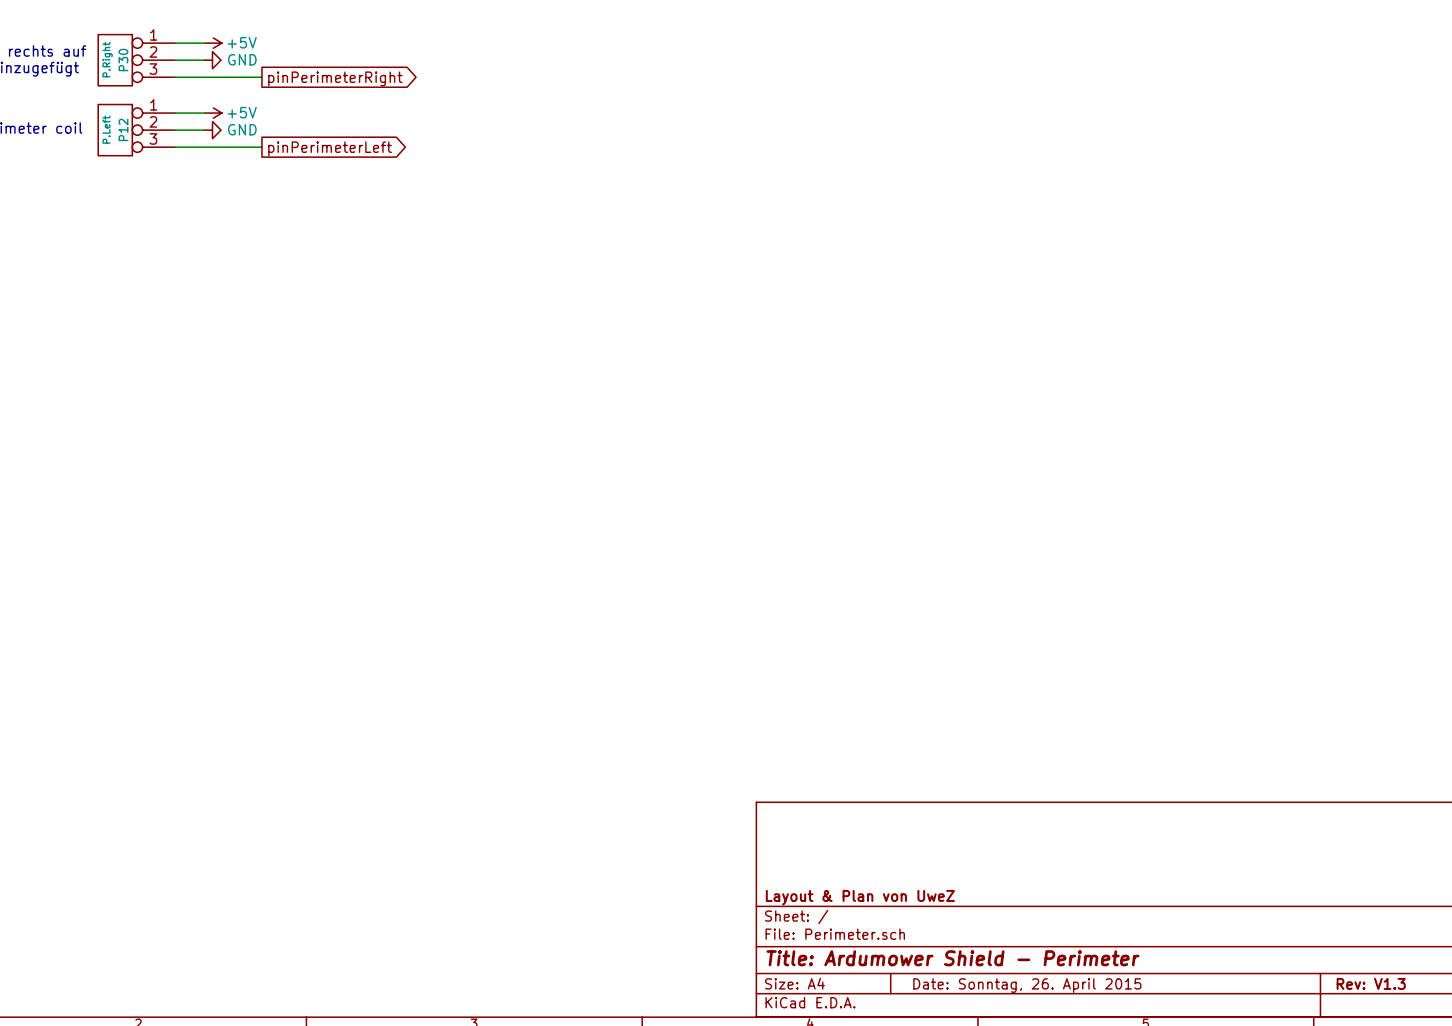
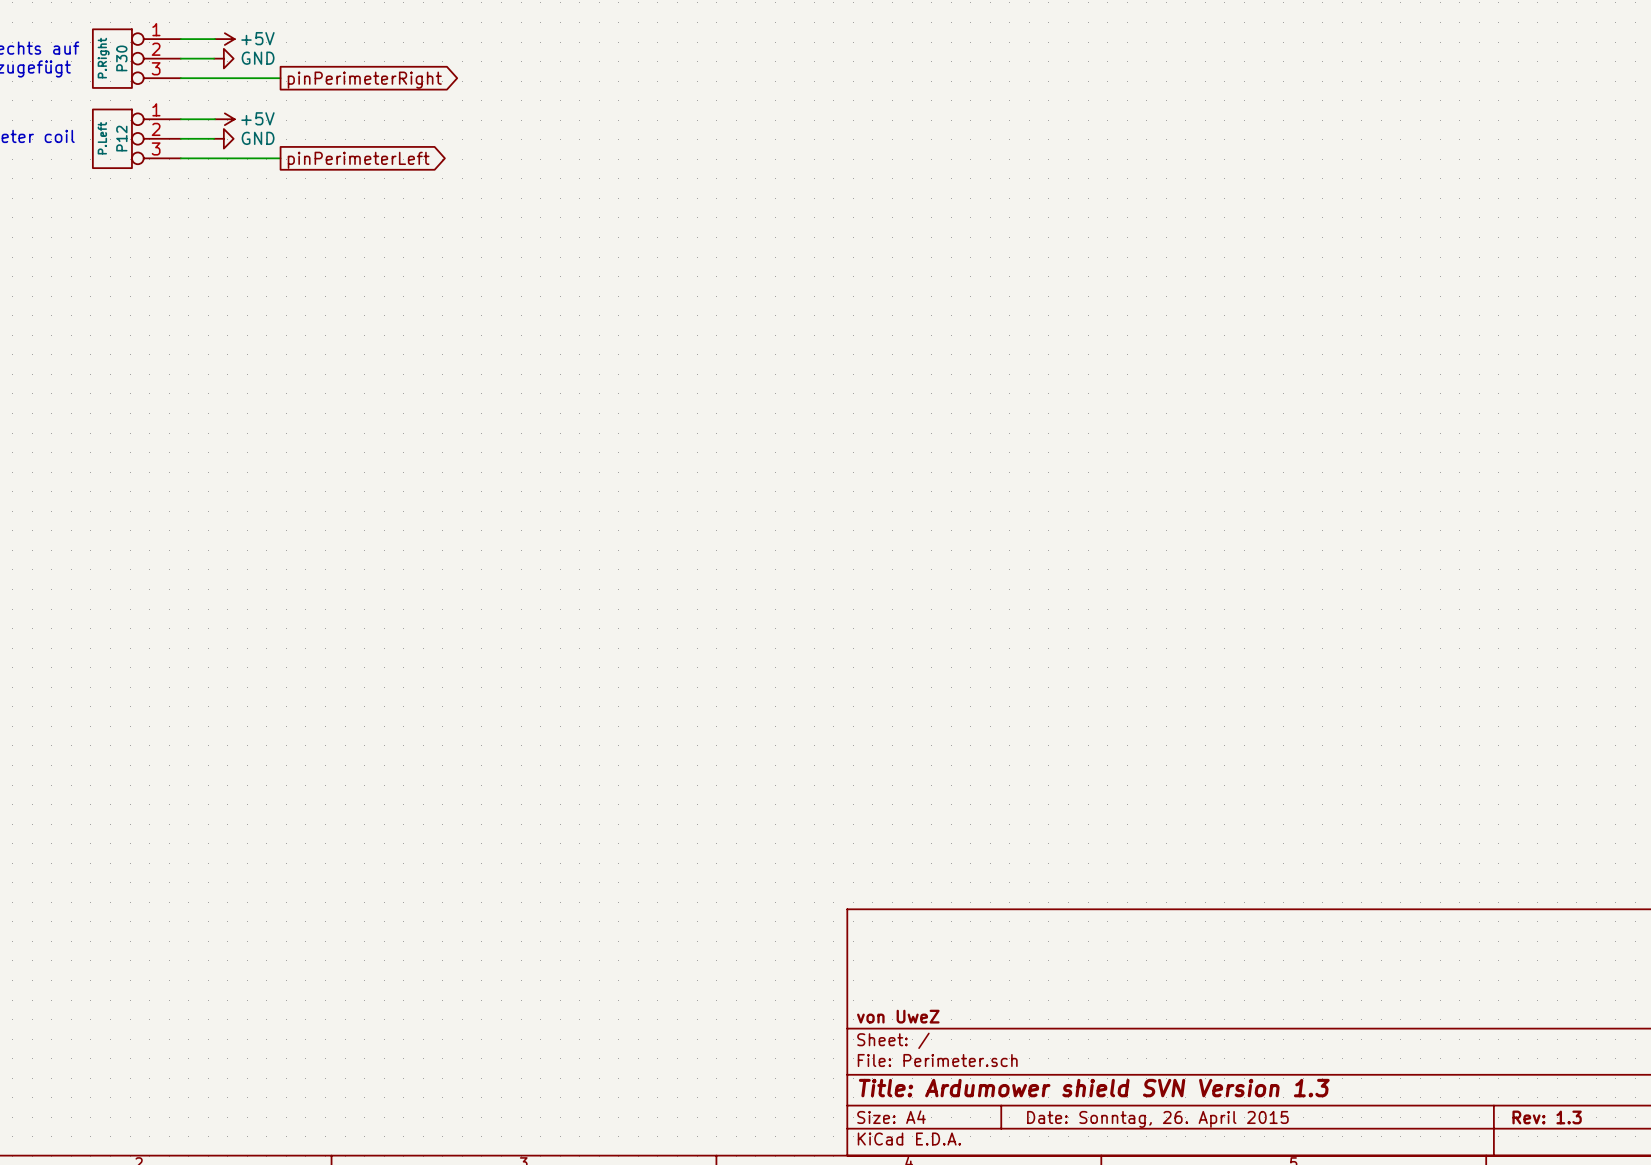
title block: Layout & Plan von UweZ (860, 897) -> von UweZ (898, 1016)
title block: Title: Ardumower Shield - Perimeter (953, 958) -> Title: Ardumower shield SVN Version 1.3 (1094, 1088)
title block: Rev: V1.3 (1371, 983) -> Rev: 1.3 (1547, 1117)

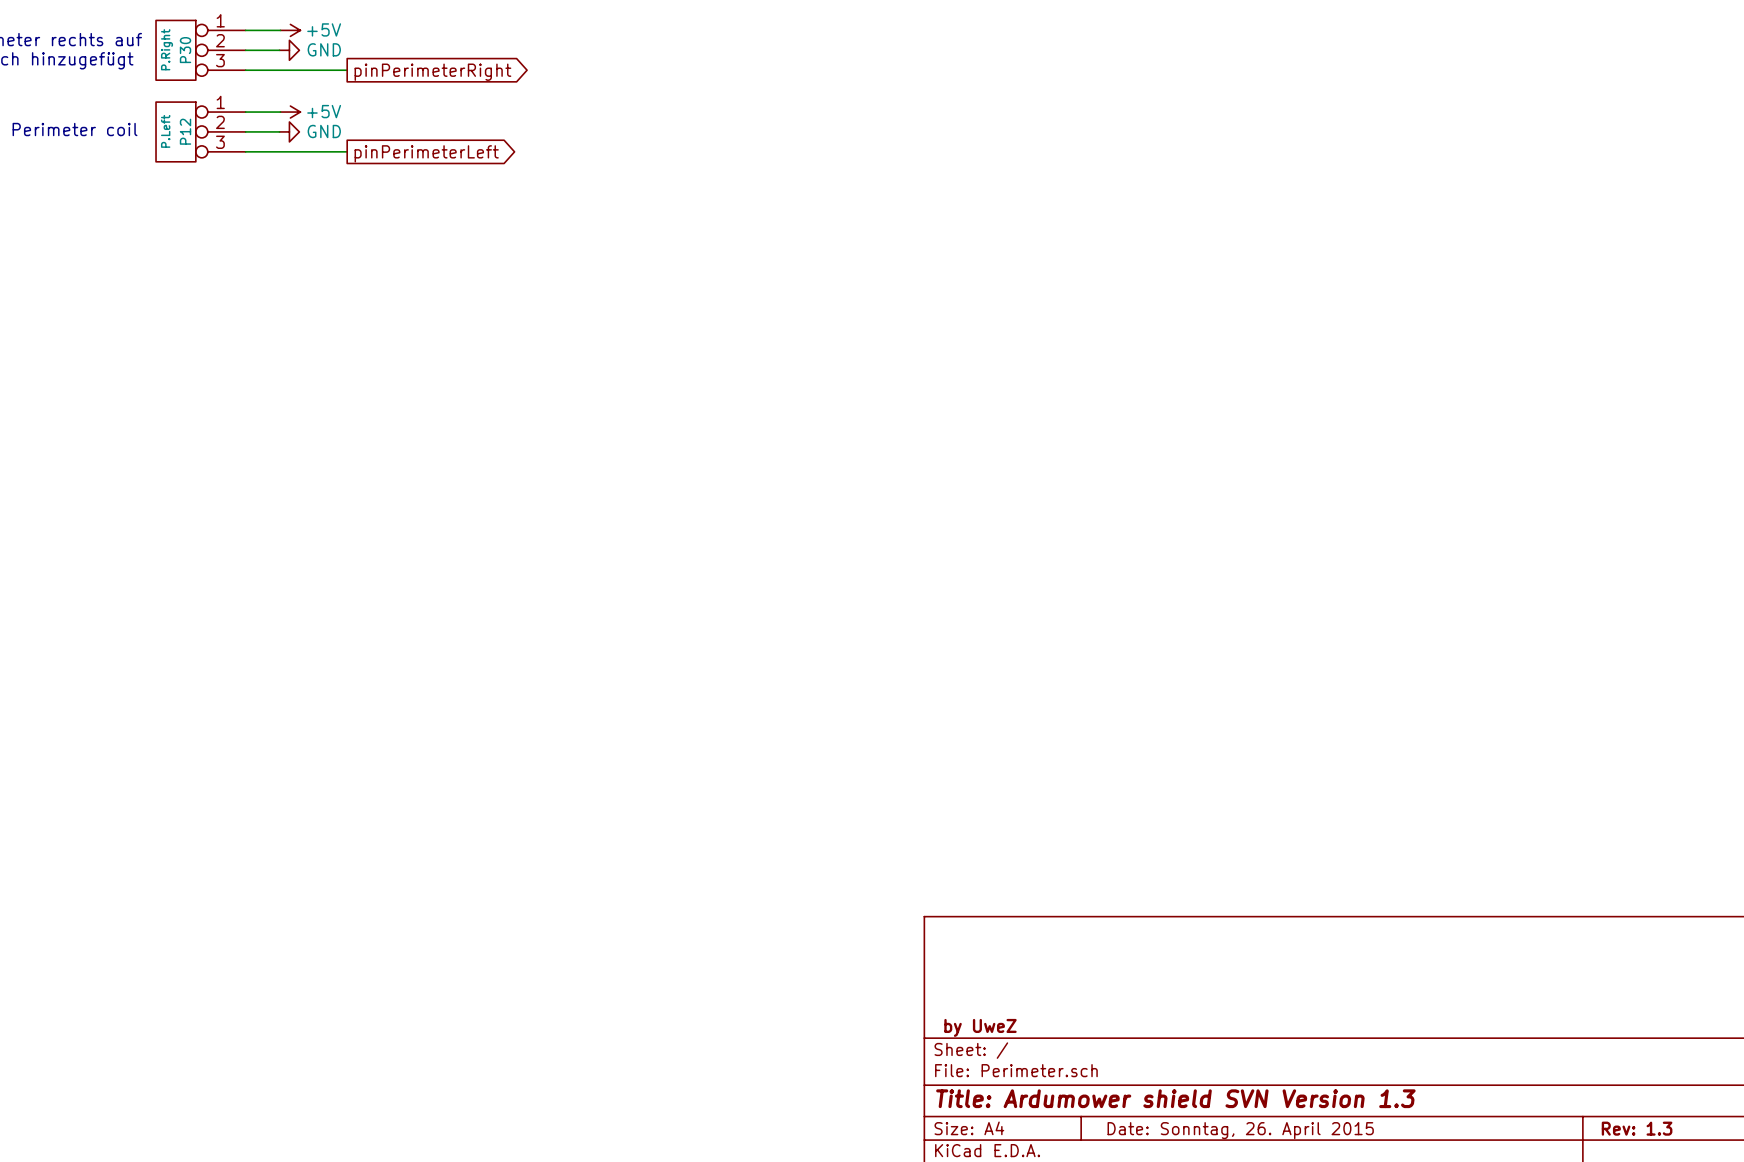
title block: von UweZ (898, 1016) -> by UweZ (980, 1027)

